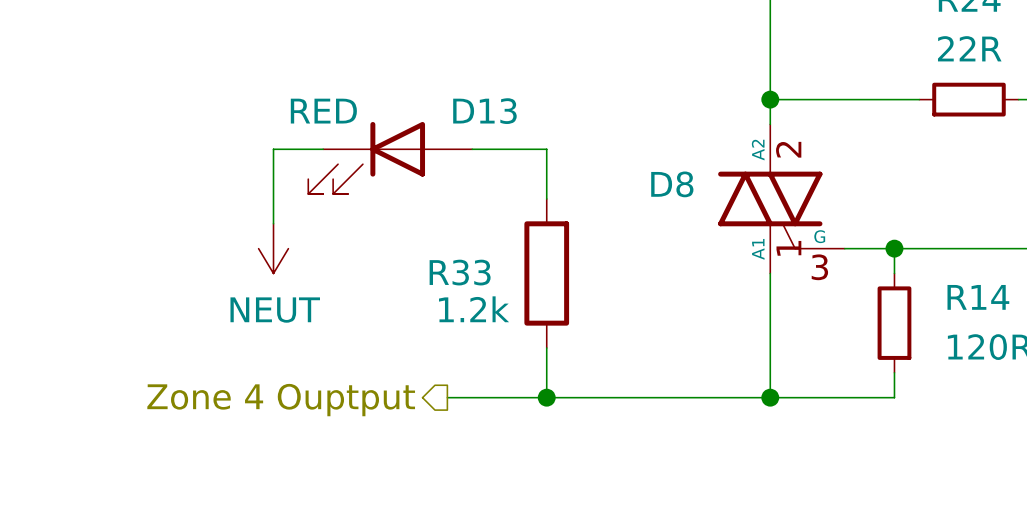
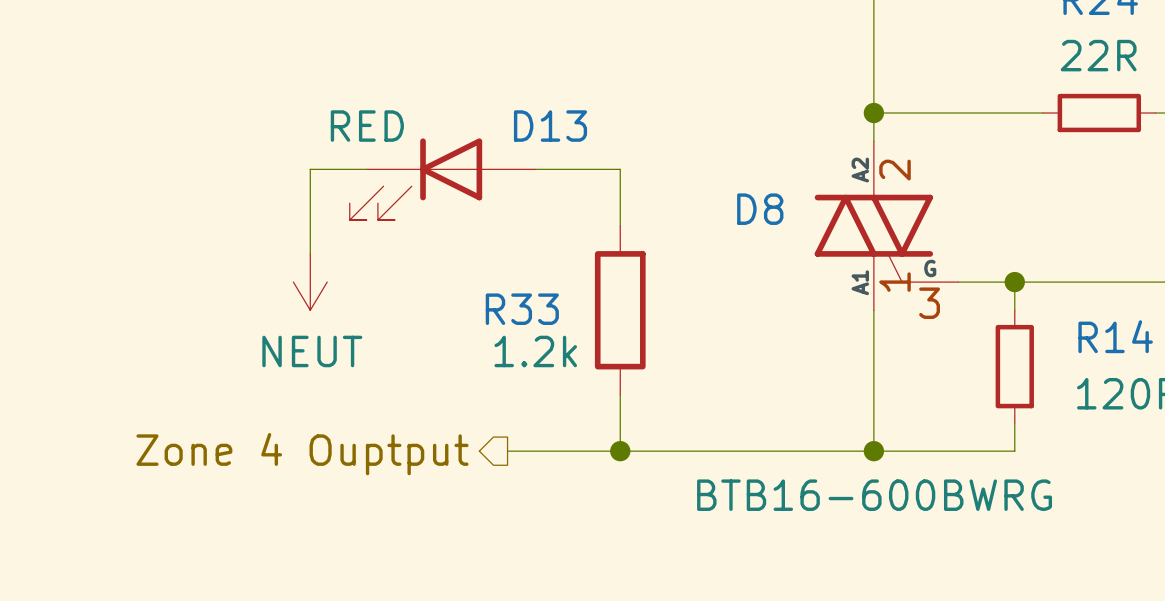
D8 text: none -> BTB16-600BWRG (874, 495)

